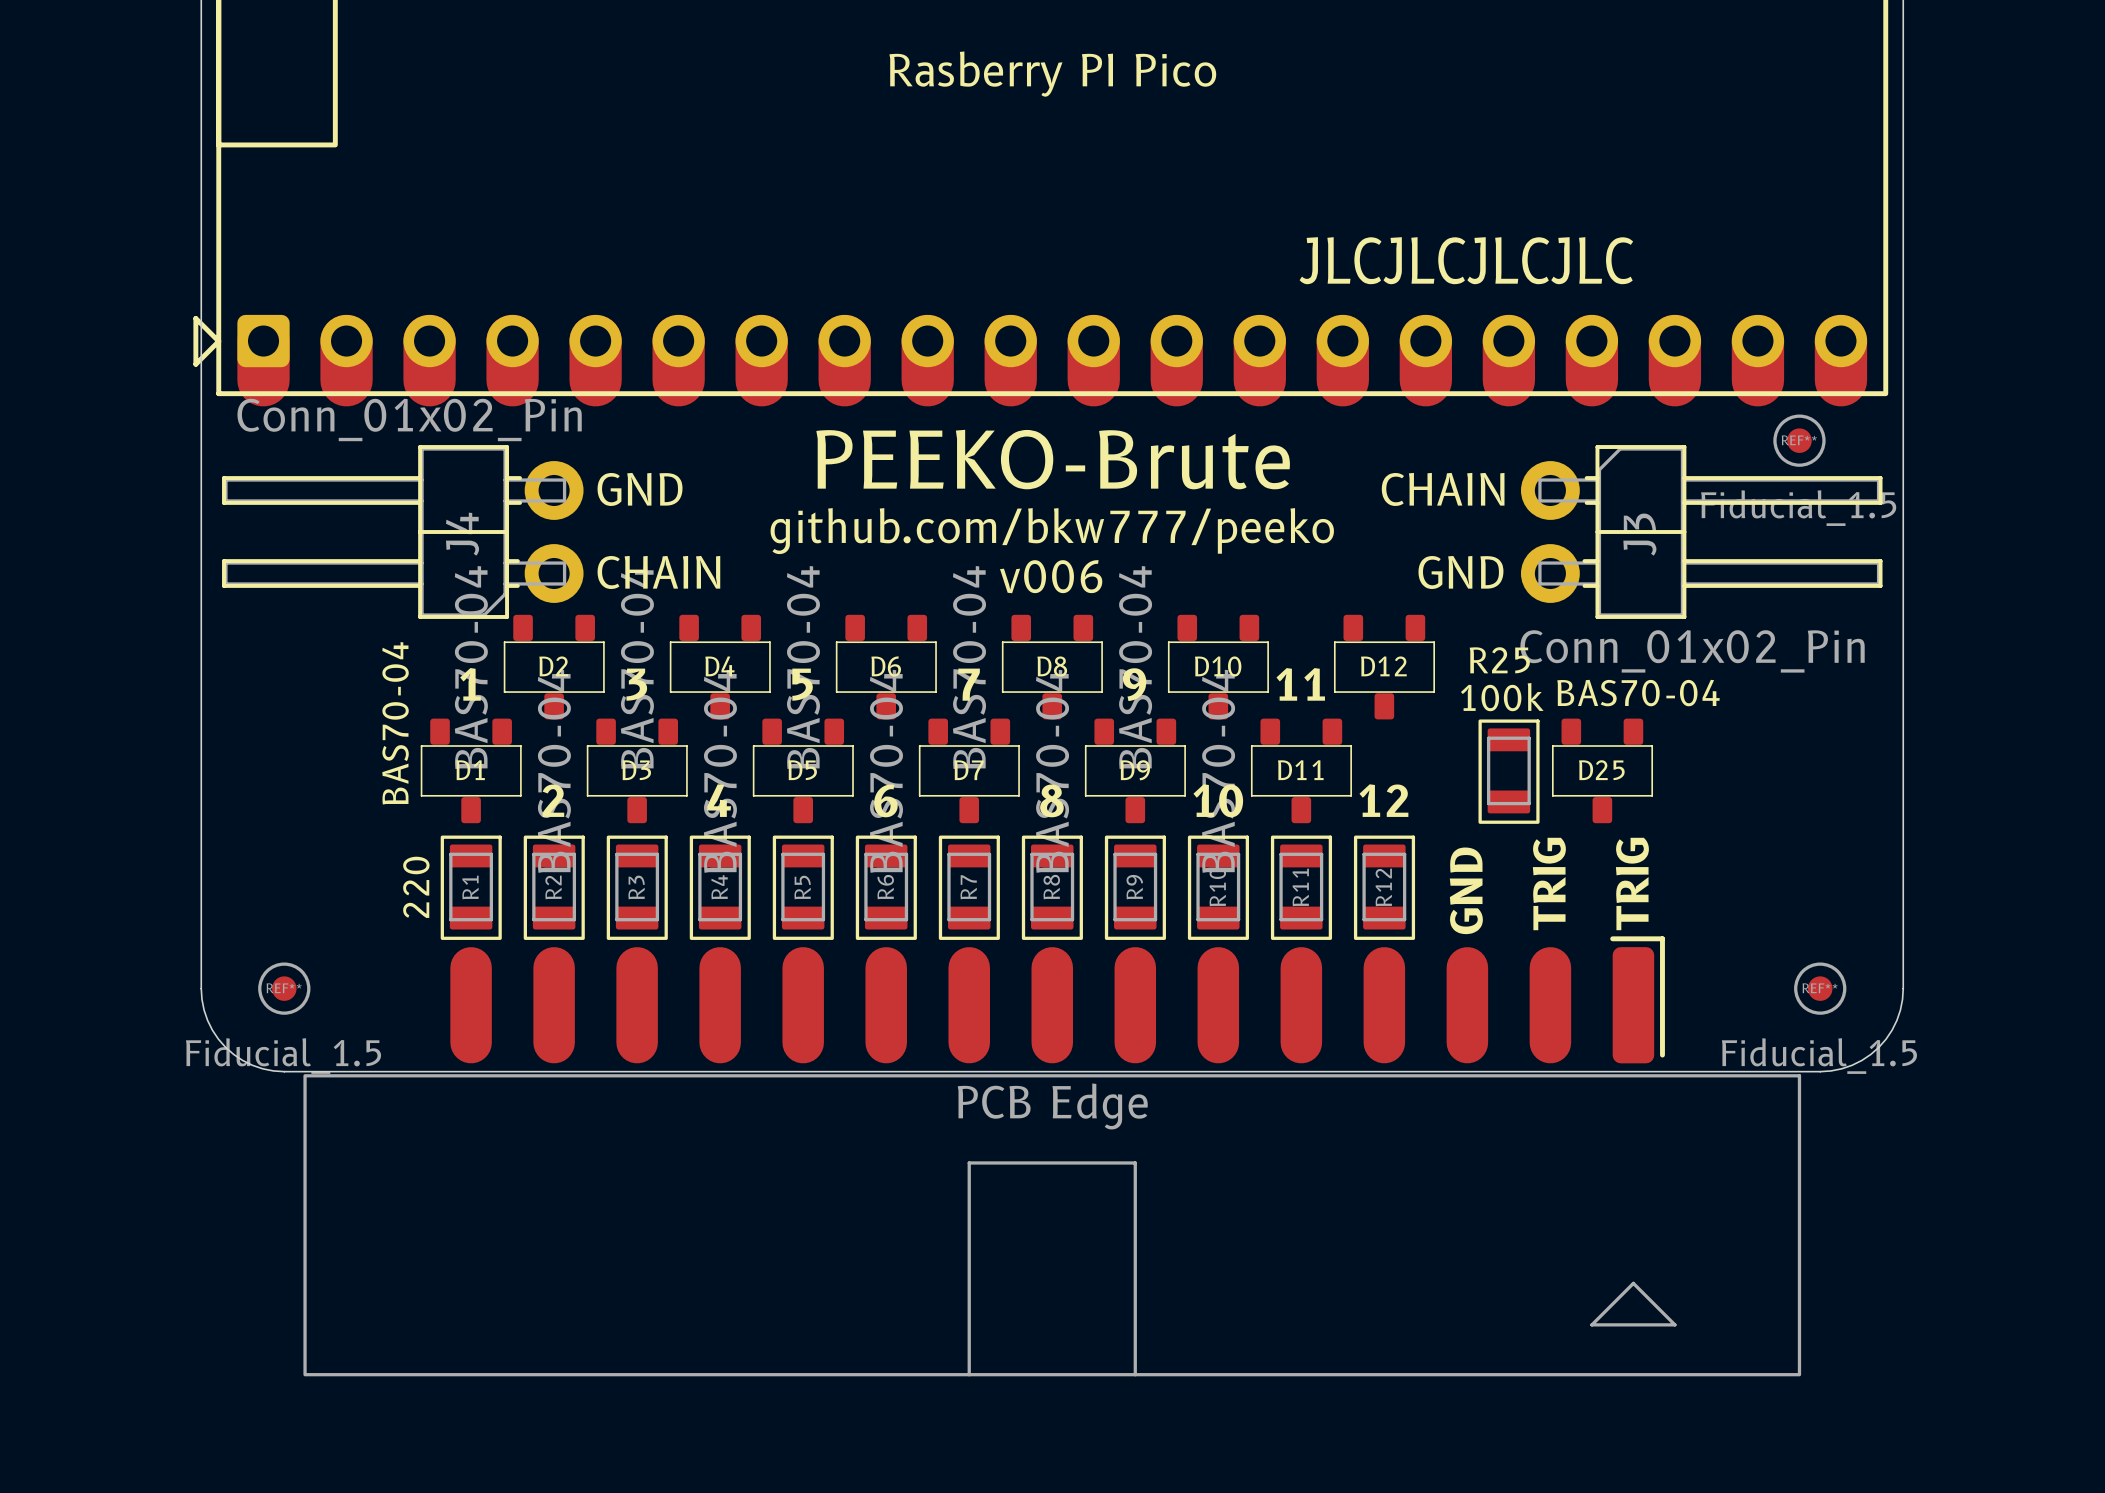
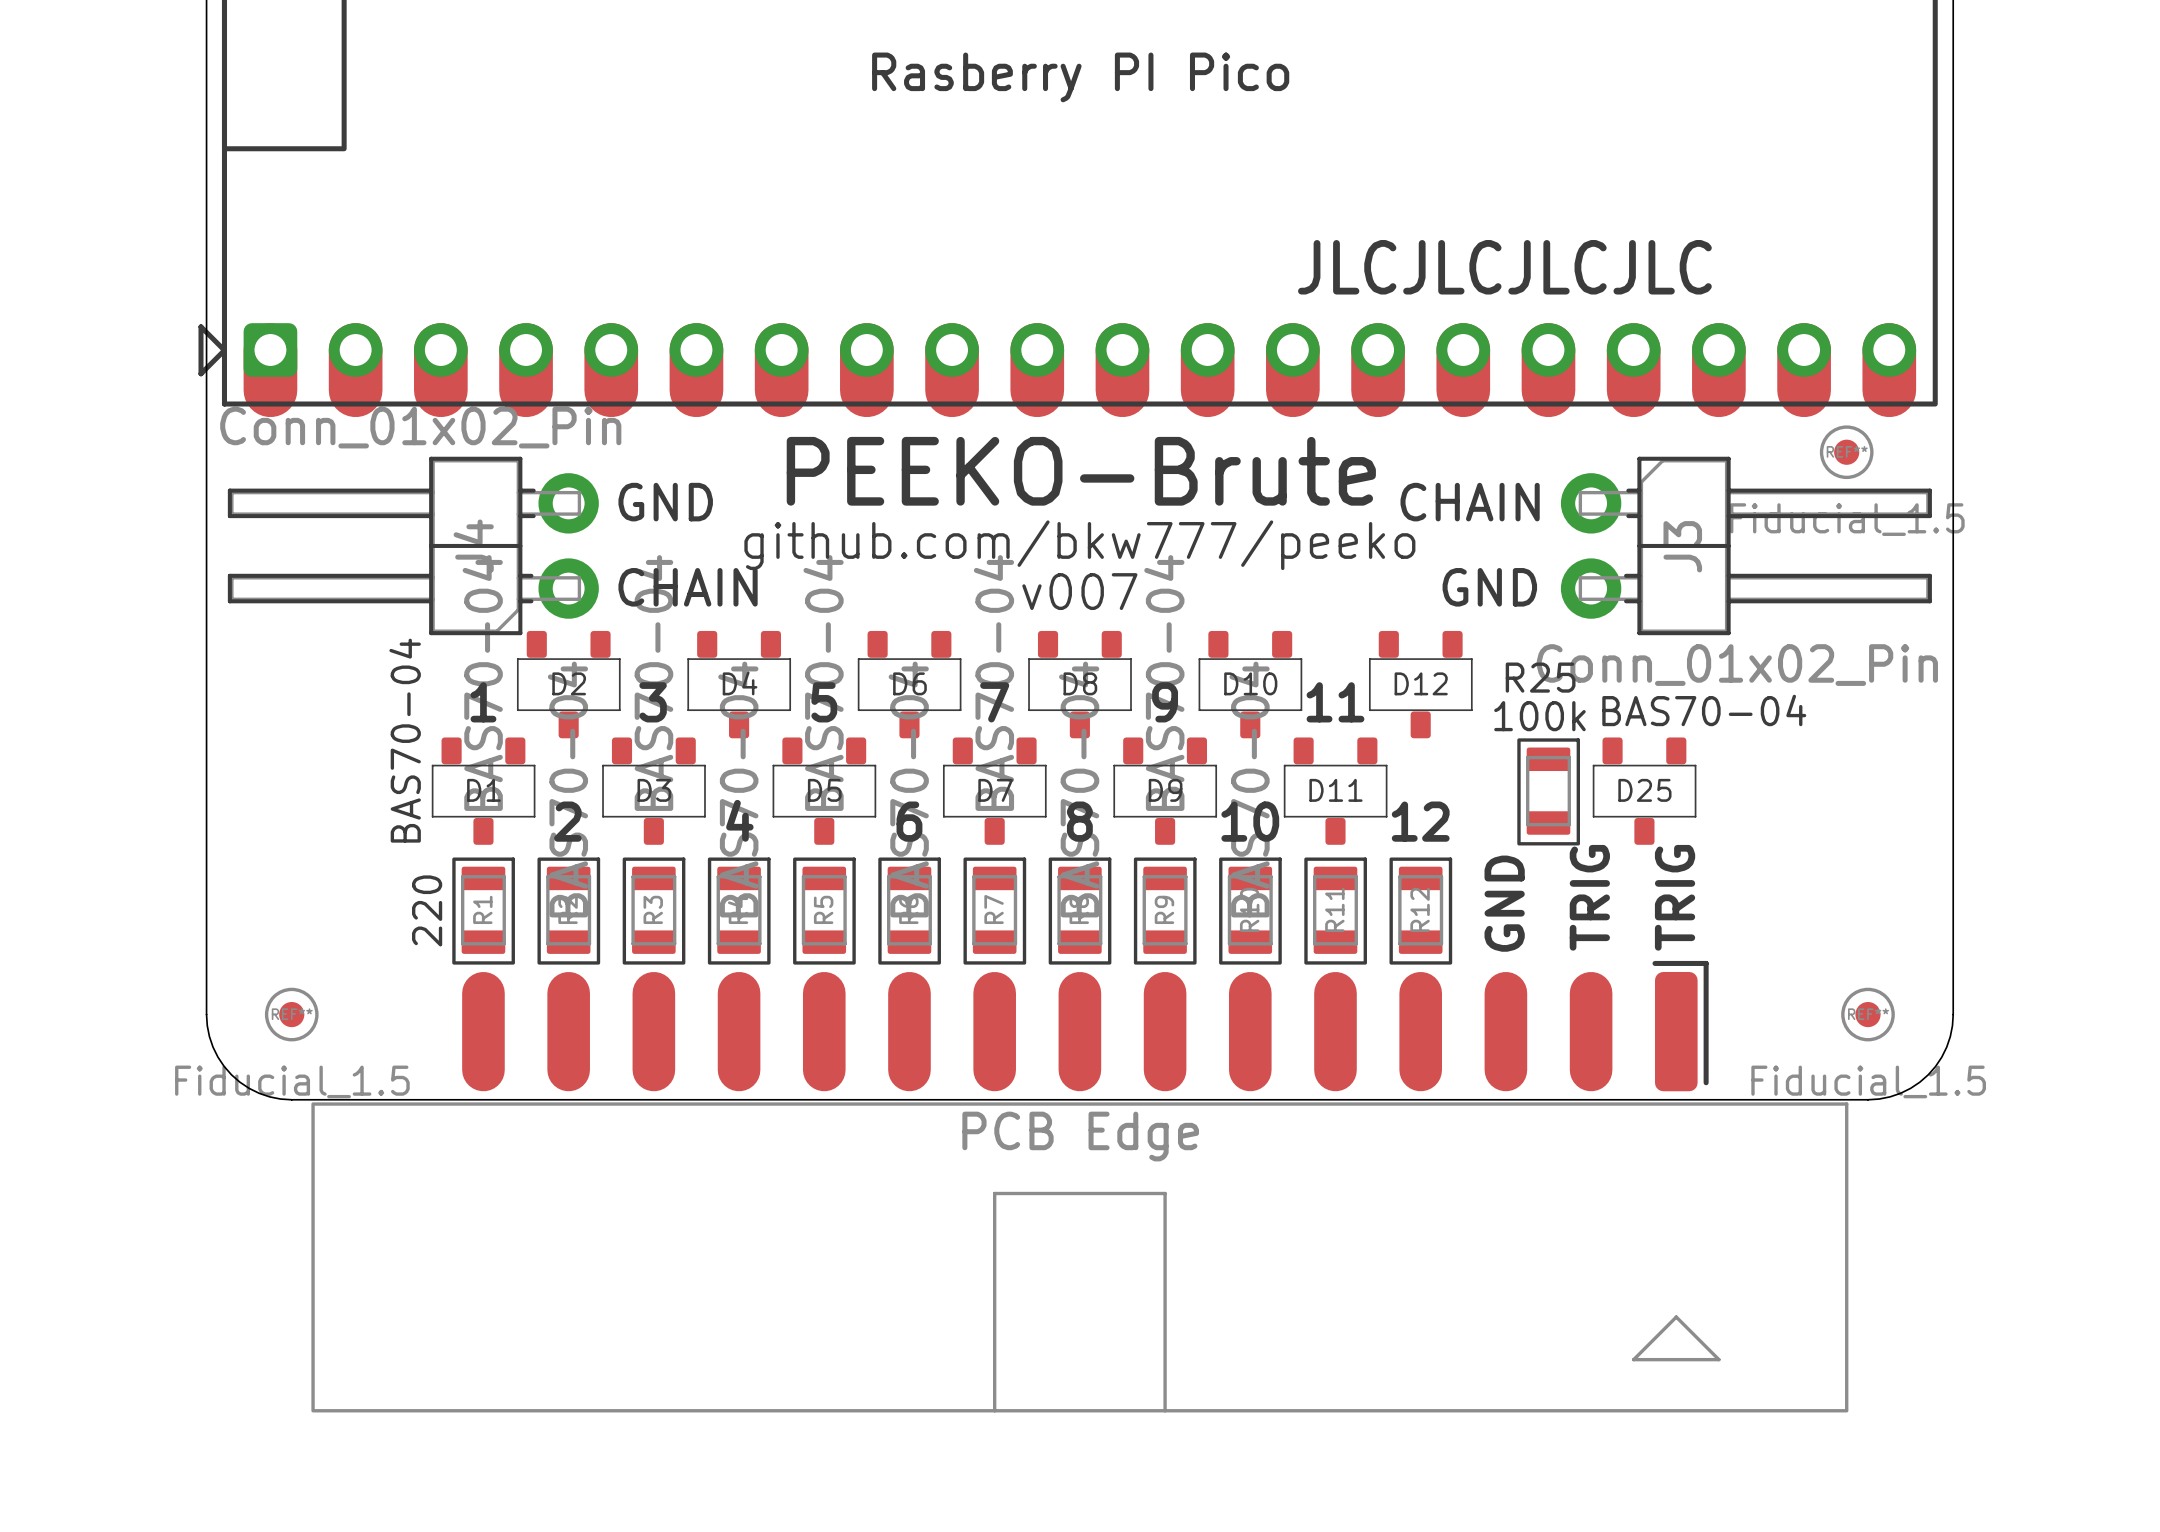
text: v006 (1051, 576) -> v007 (1079, 591)

